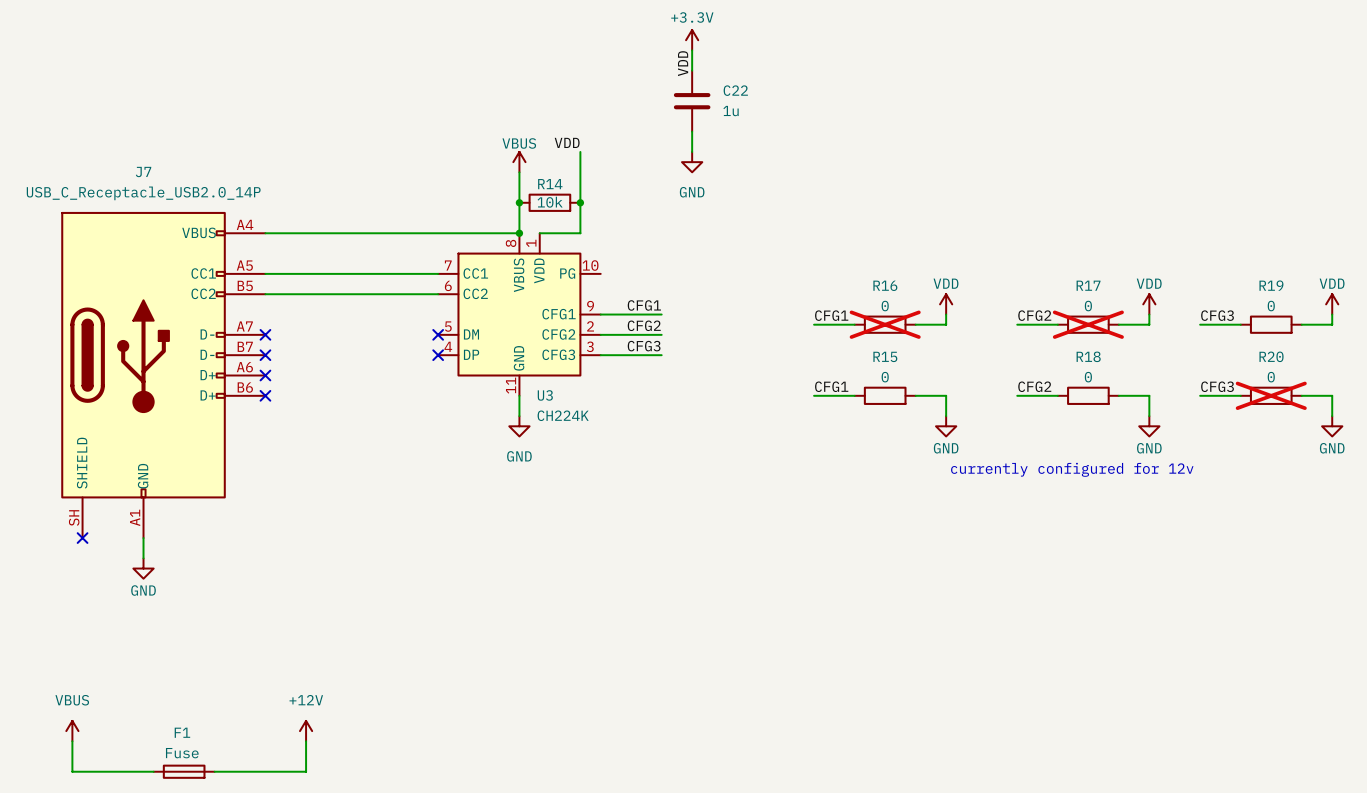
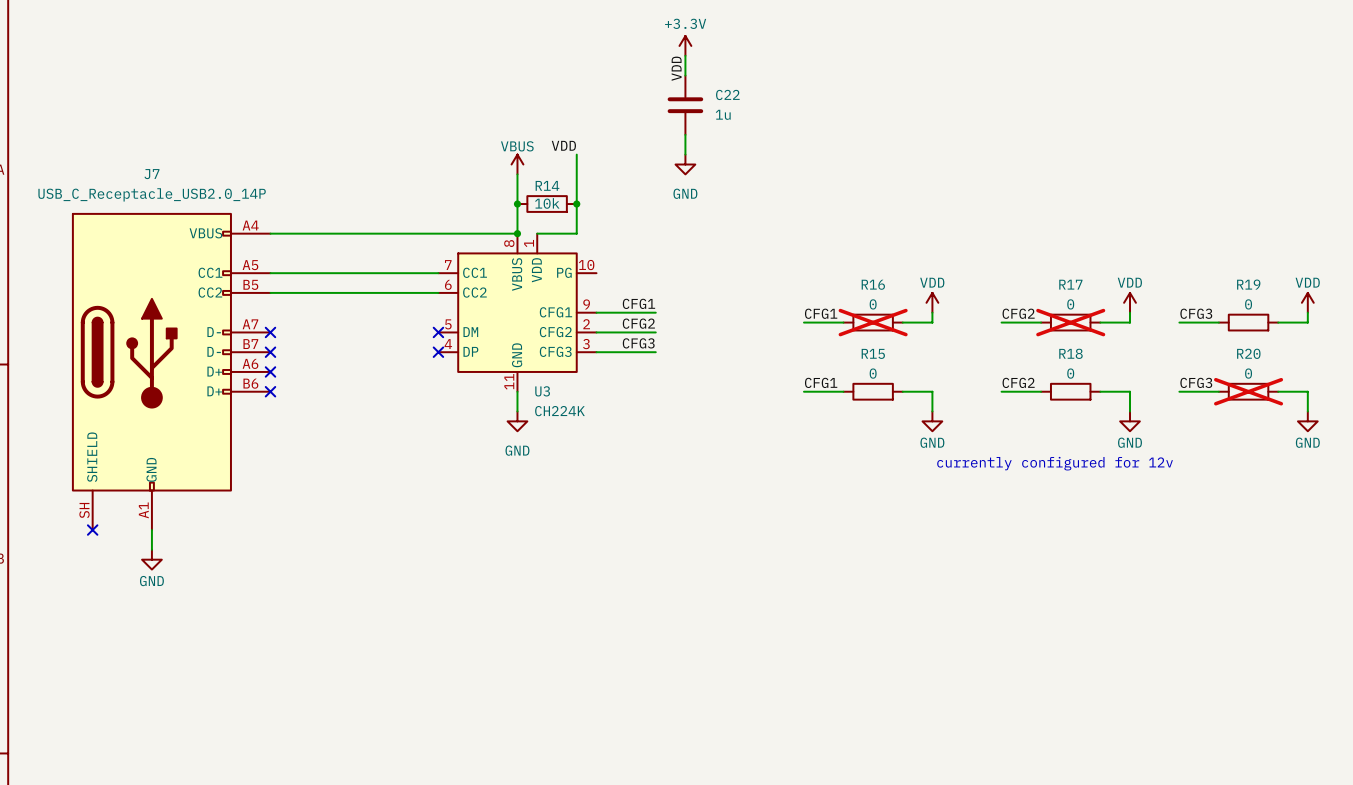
power symbol: VBUS (72, 731) -> none
power symbol: +12V (306, 731) -> none
wire: (72, 741) (72, 771) (153, 771) -> none
wire: (306, 741) (306, 771) (214, 771) -> none
F1: Fuse (184, 771) -> none

